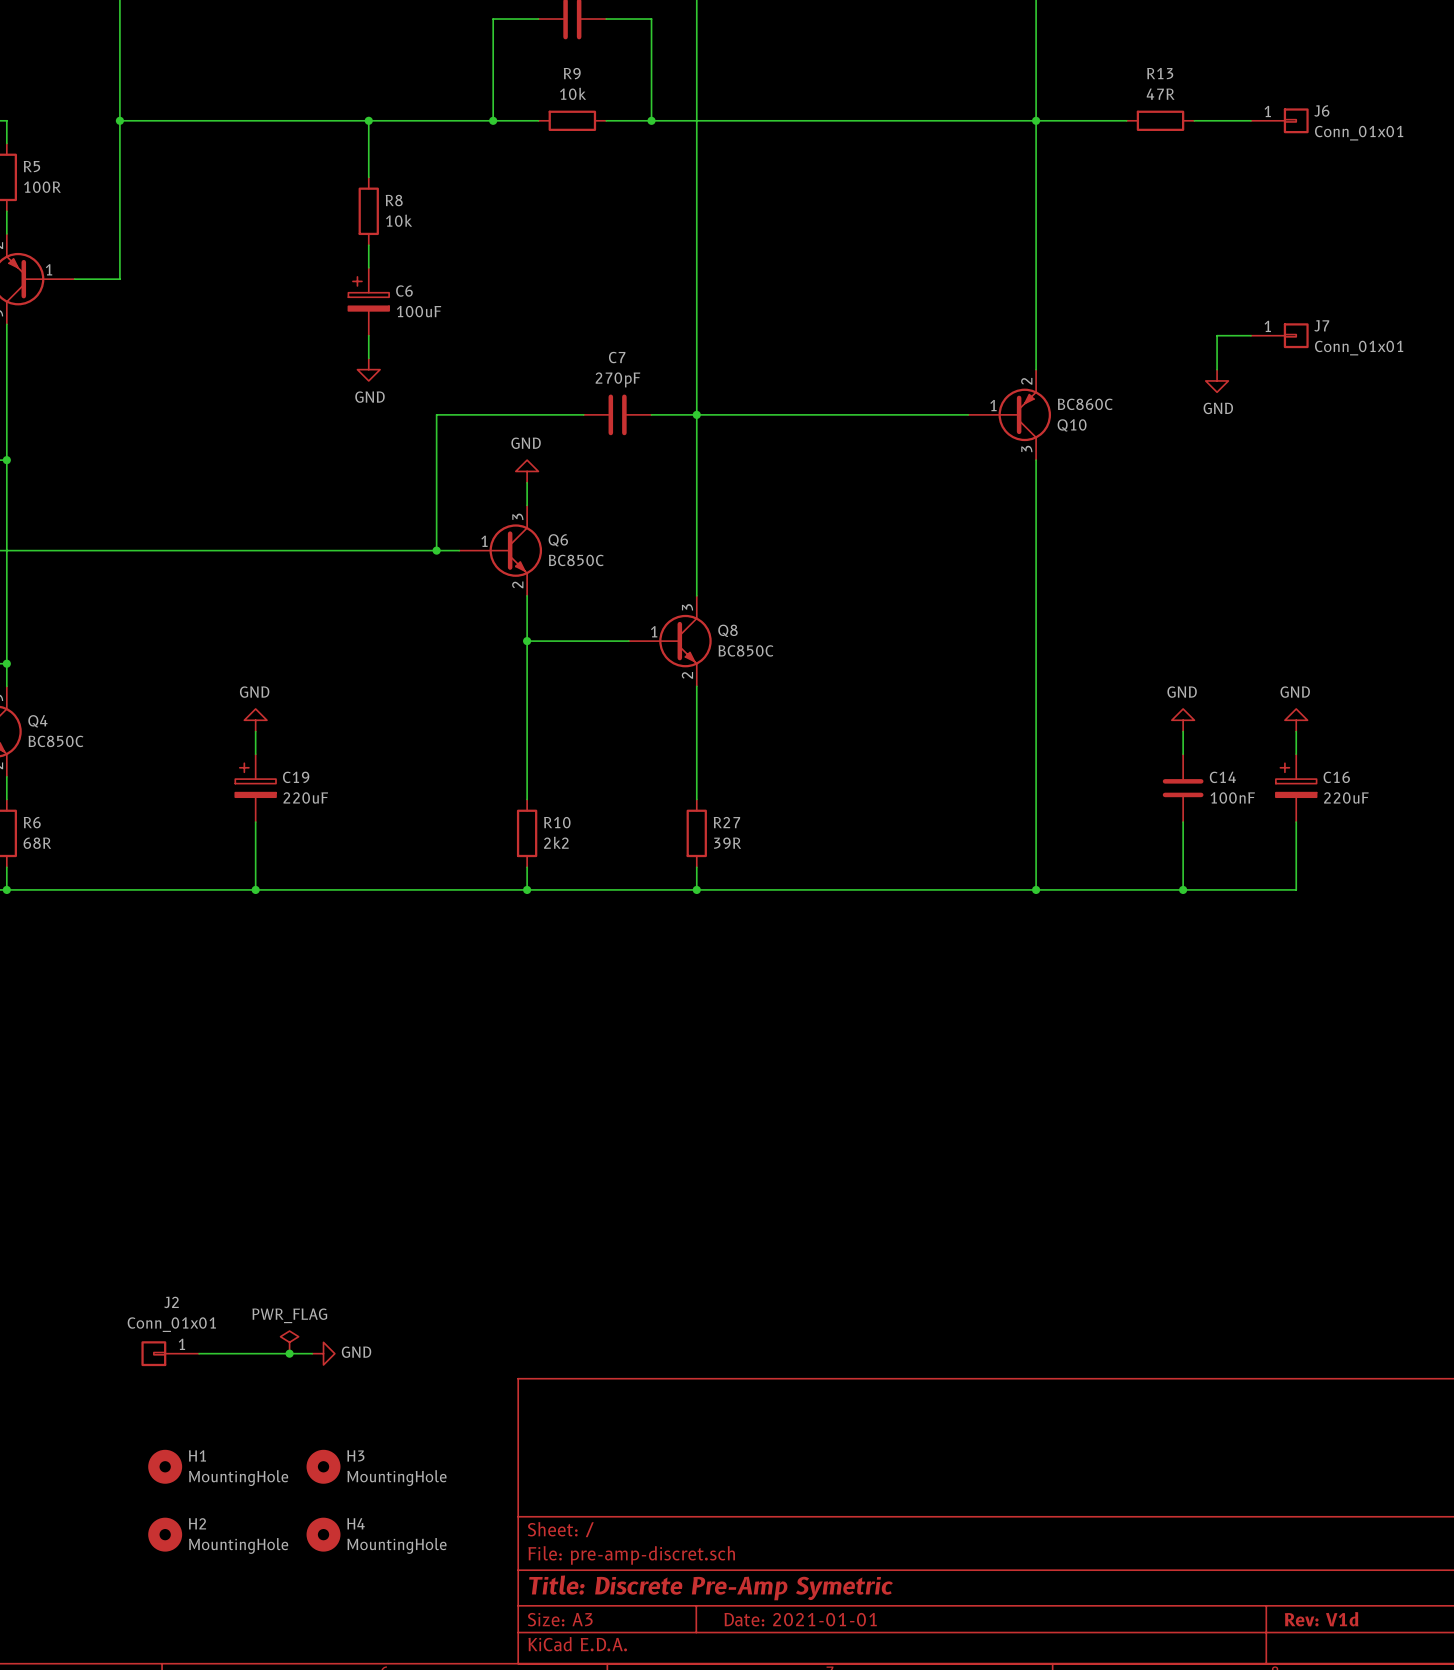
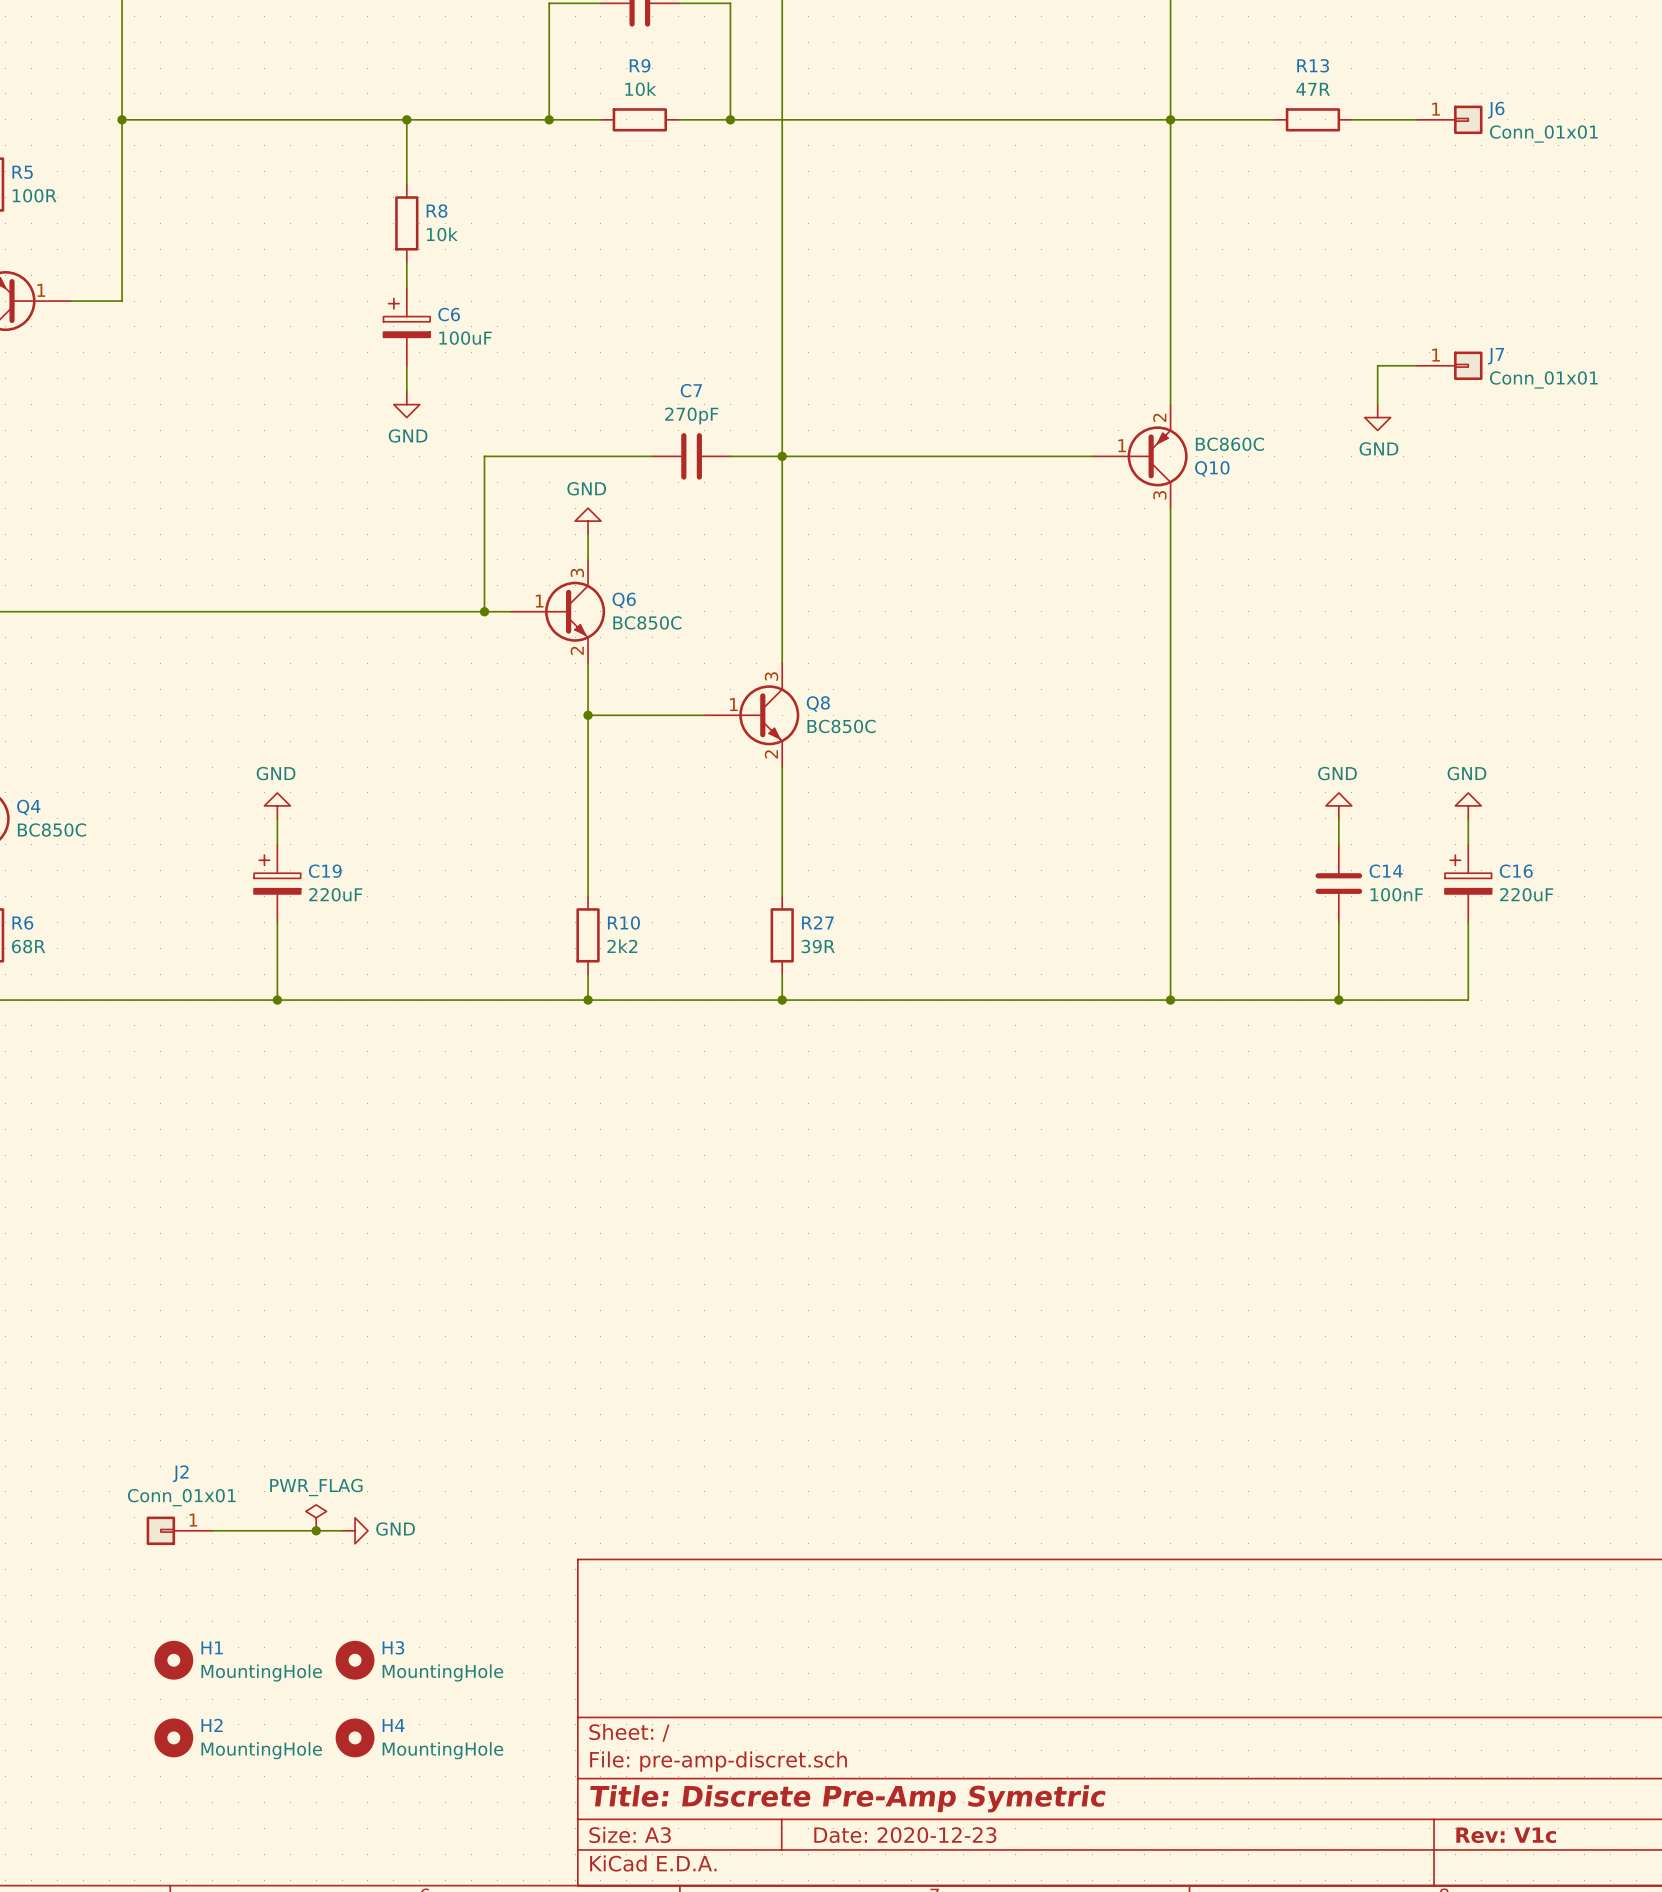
title block: Date: 2021-01-01 (800, 1619) -> Date: 2020-12-23 (905, 1835)
title block: Rev: V1d (1321, 1619) -> Rev: V1c (1506, 1835)

